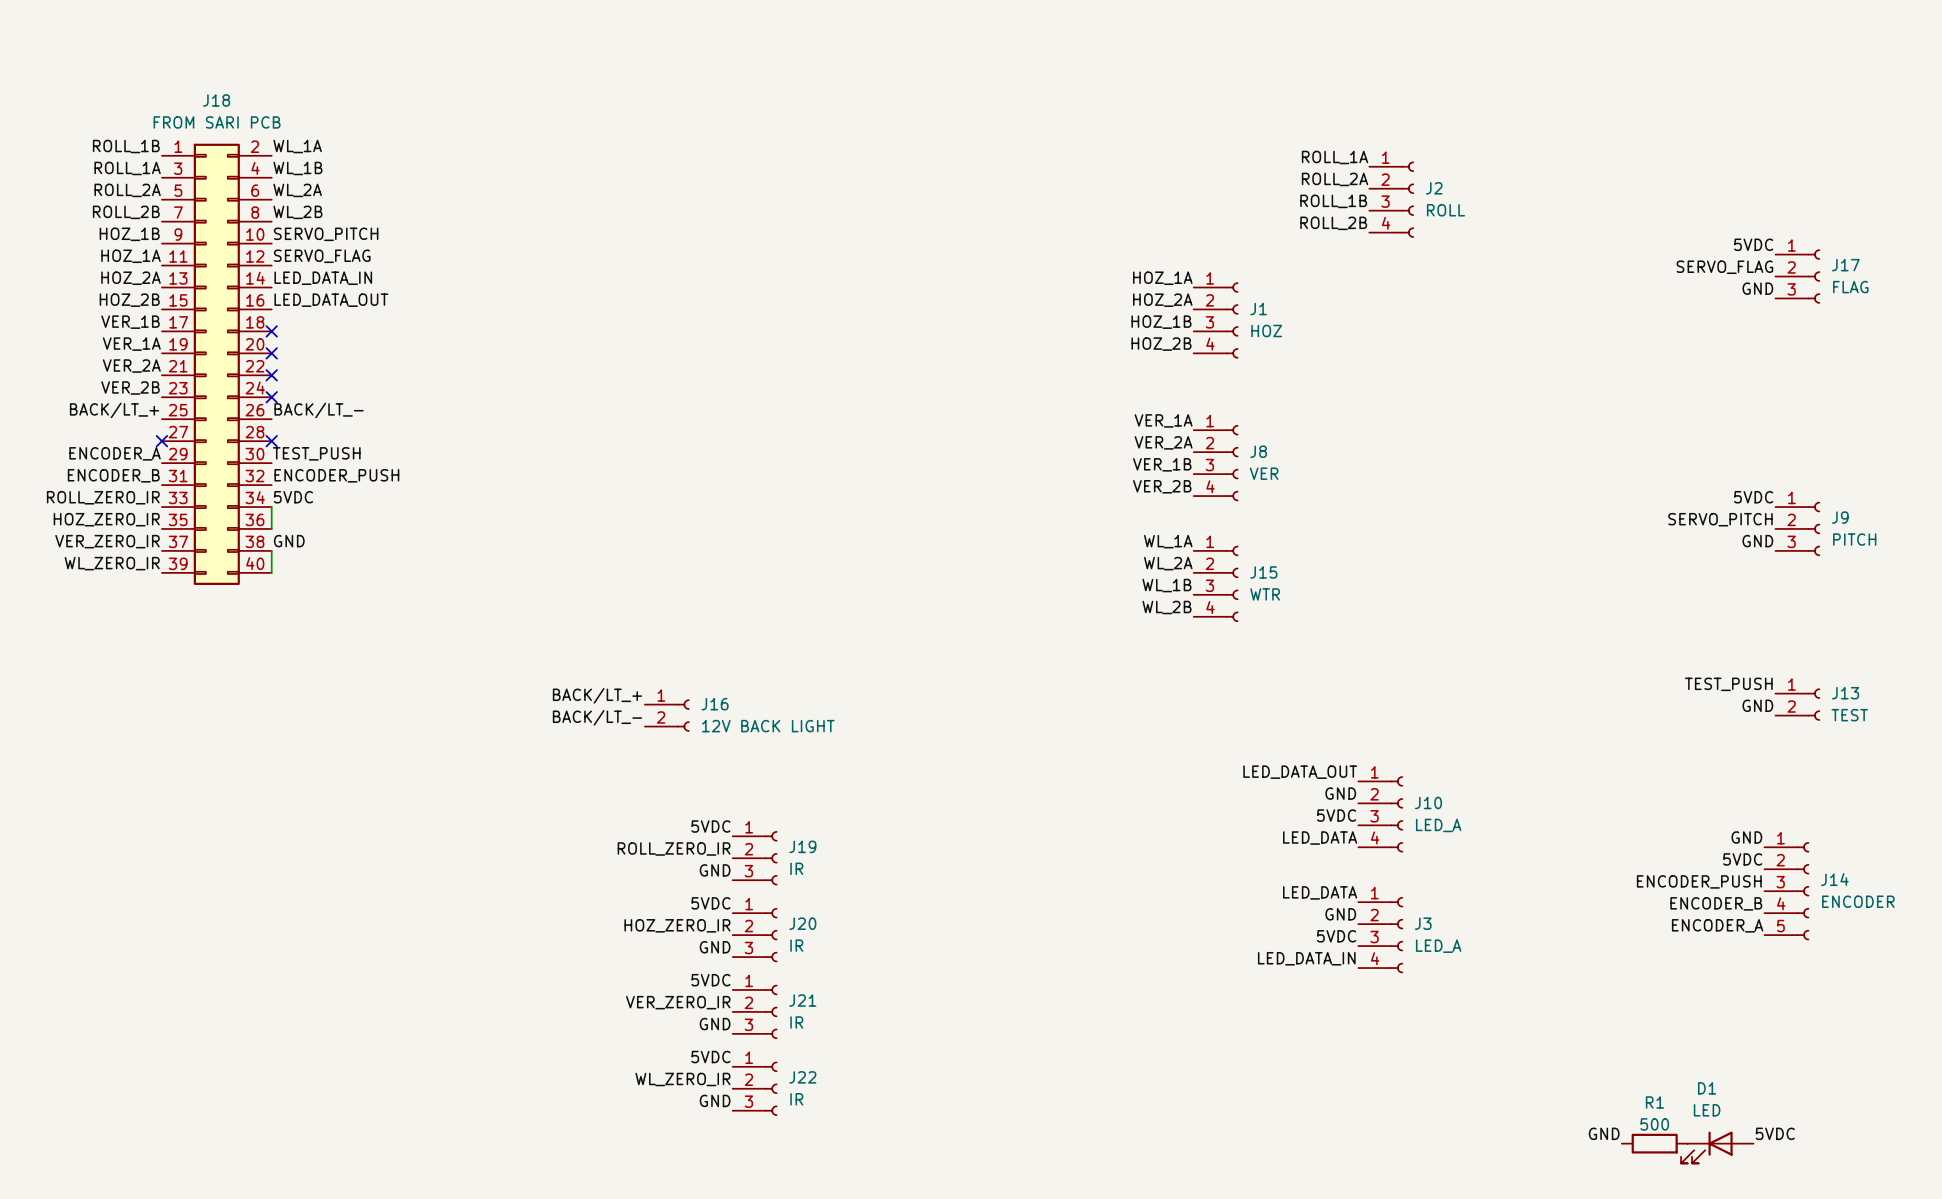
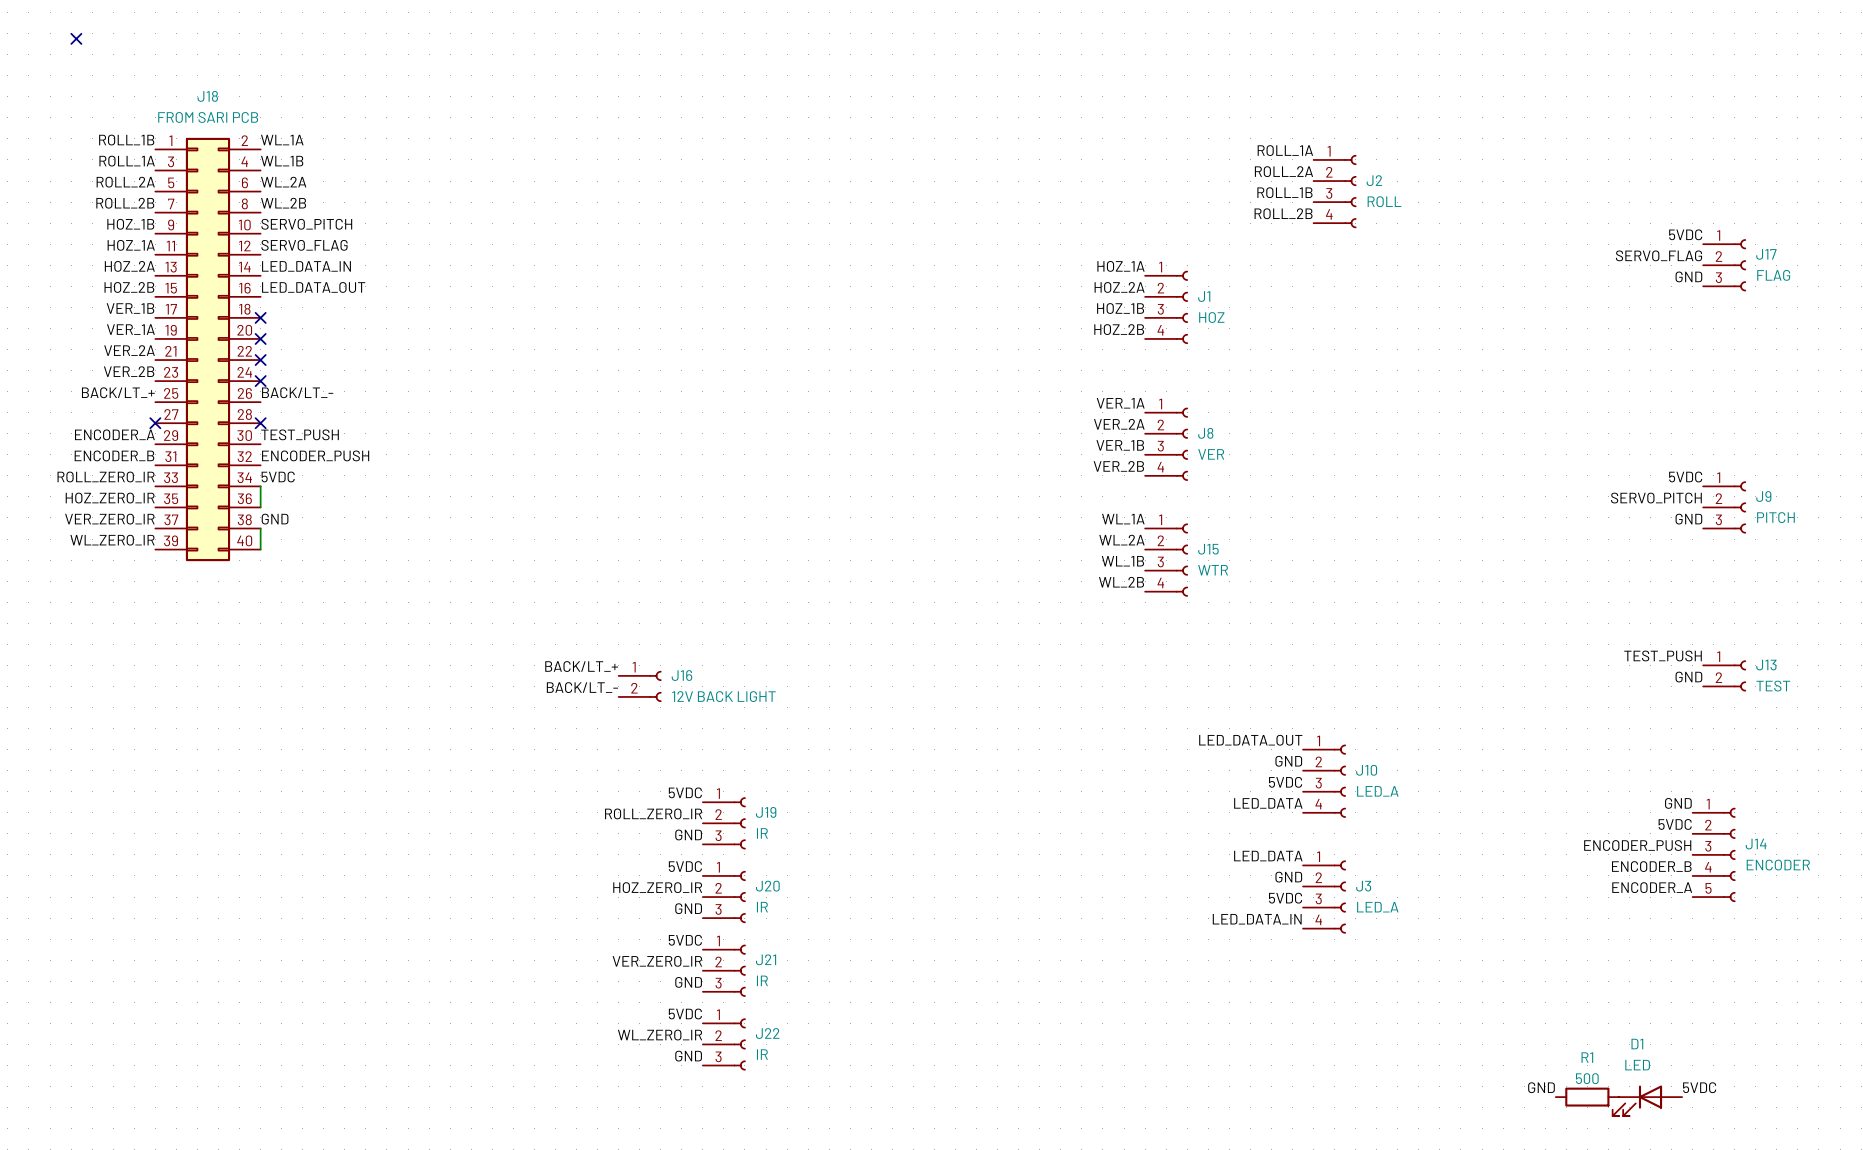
no-connect mark: none -> (76, 38)

